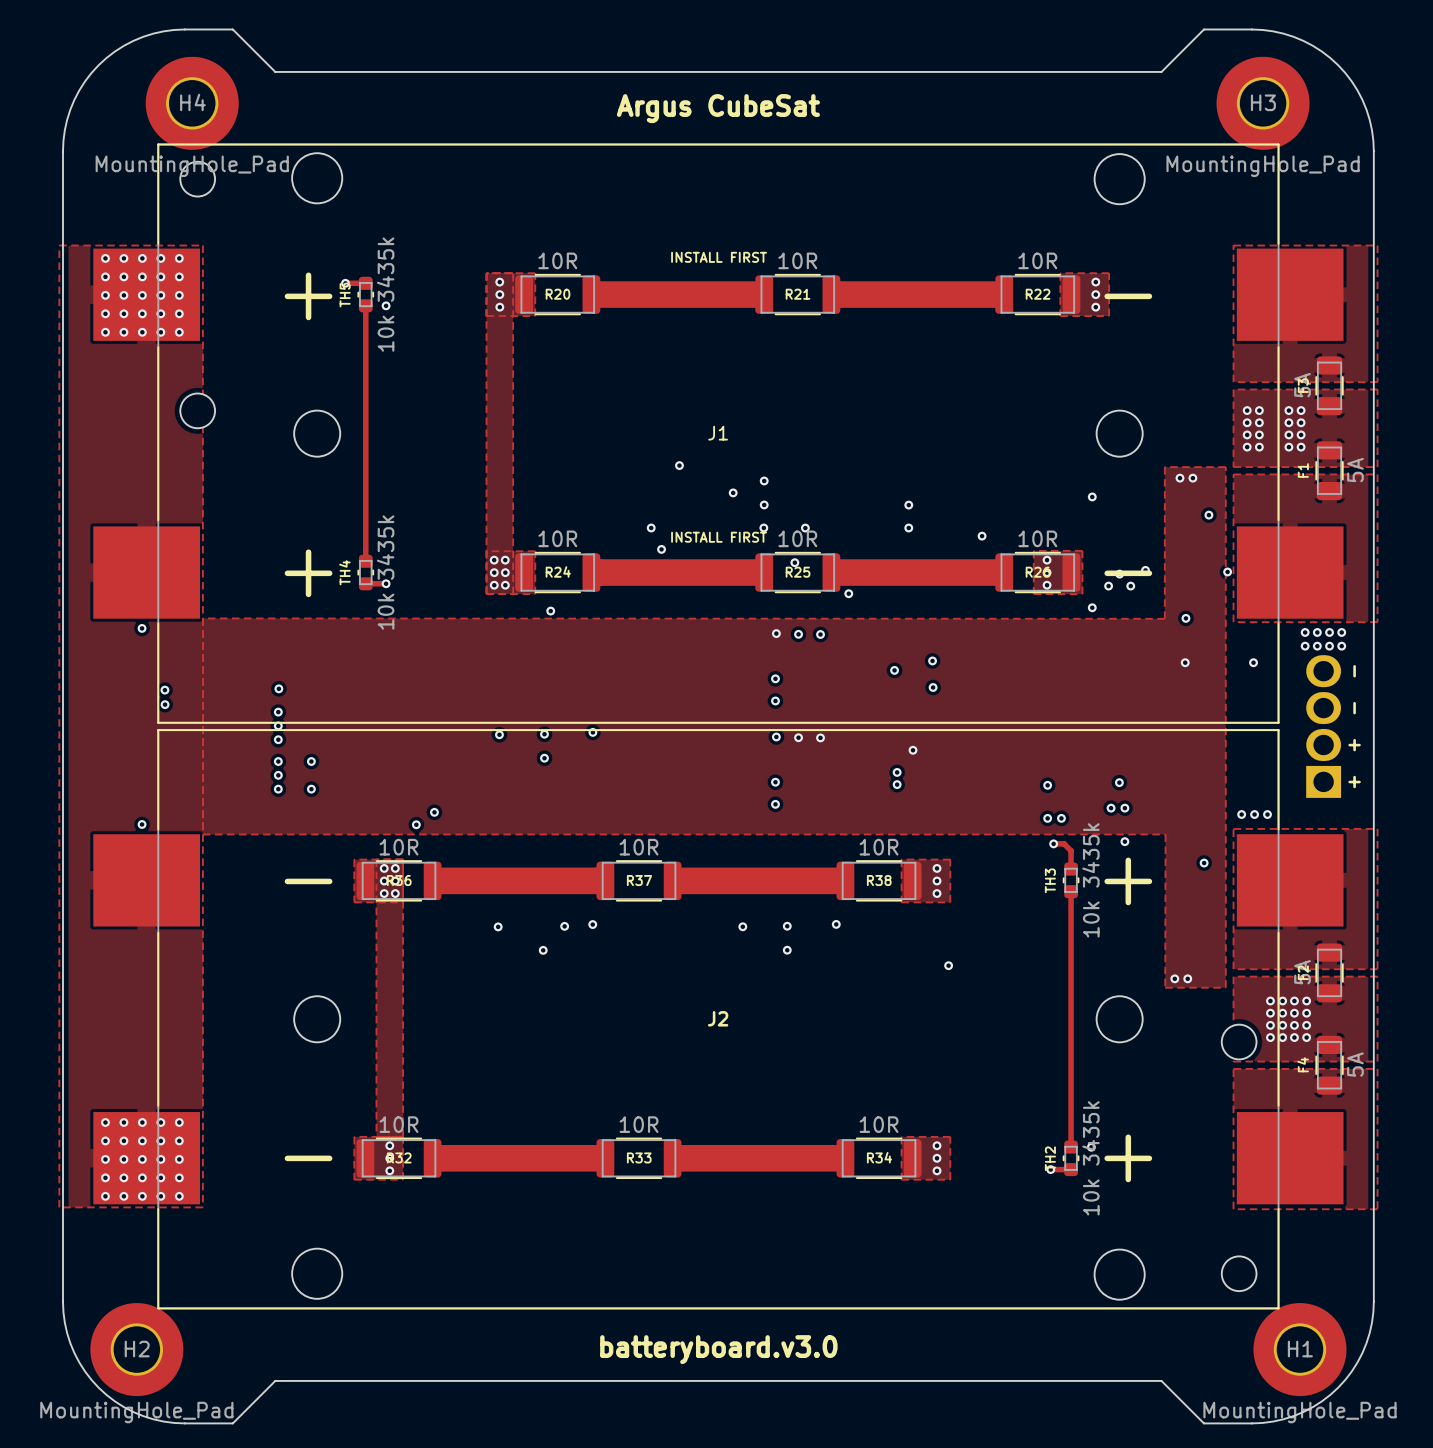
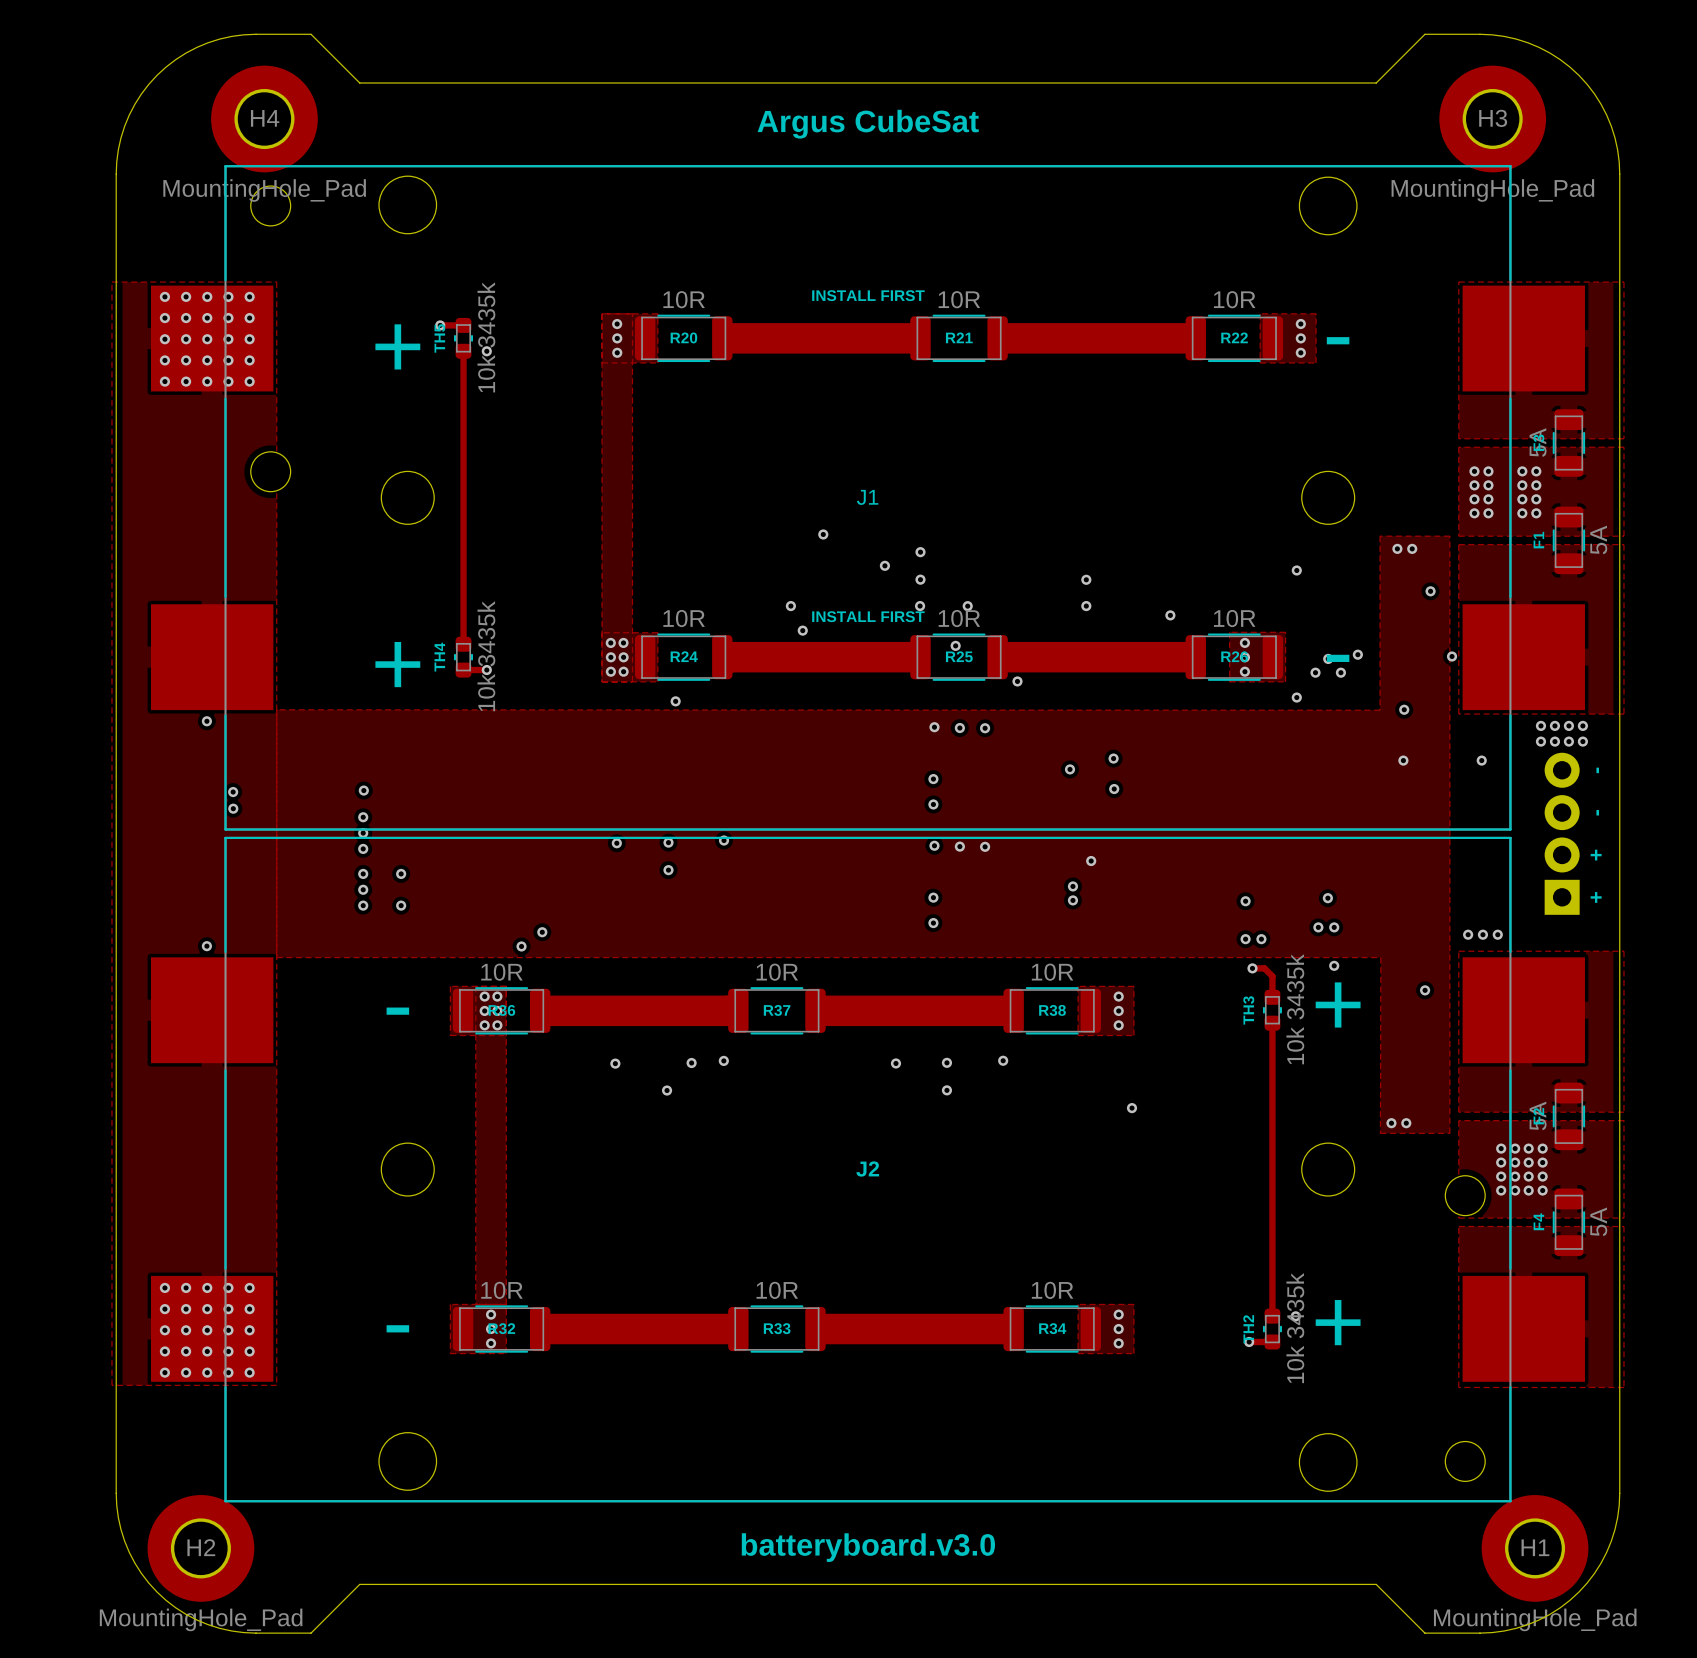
part footprint: [1306, 655, 1342, 798] -> [1544, 752, 1580, 915]

